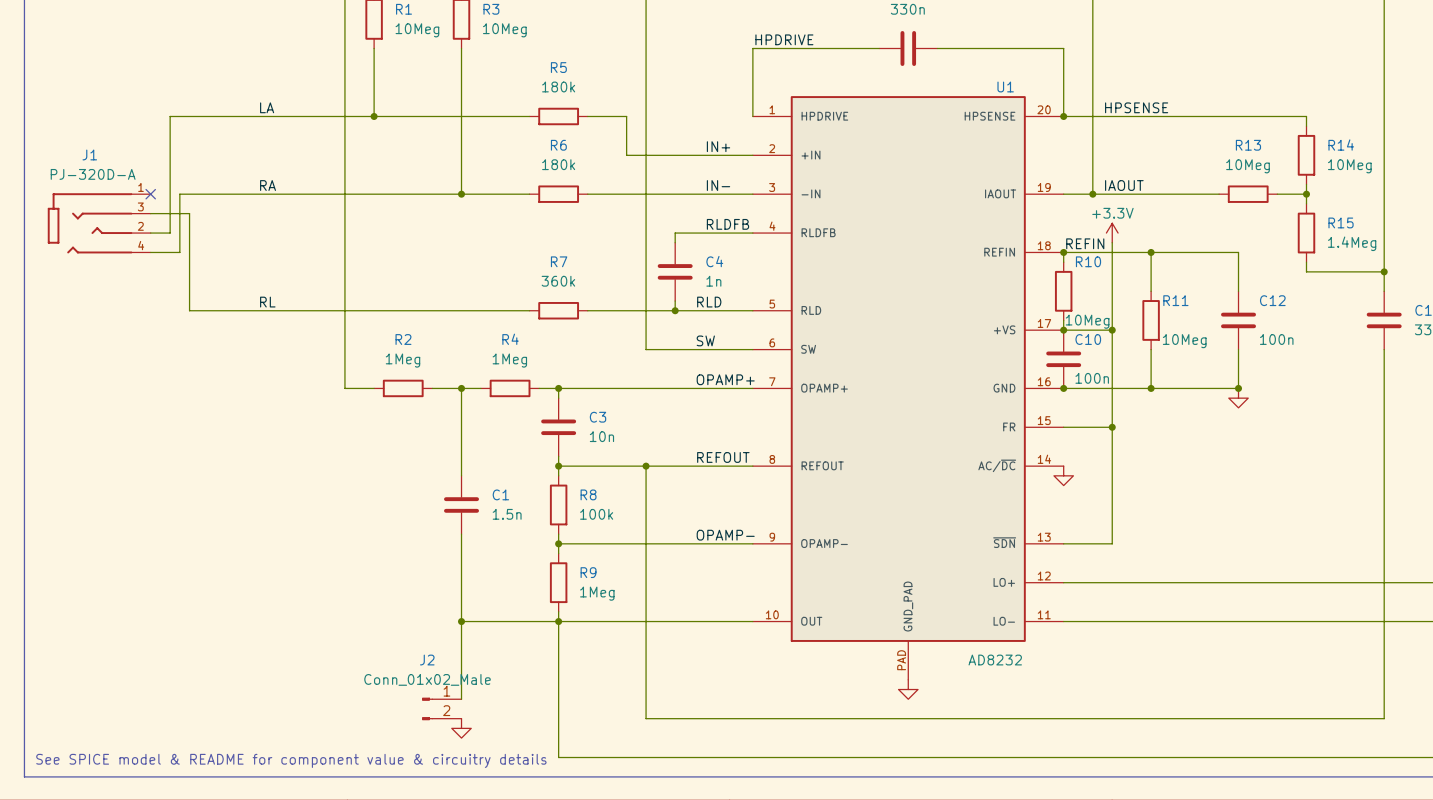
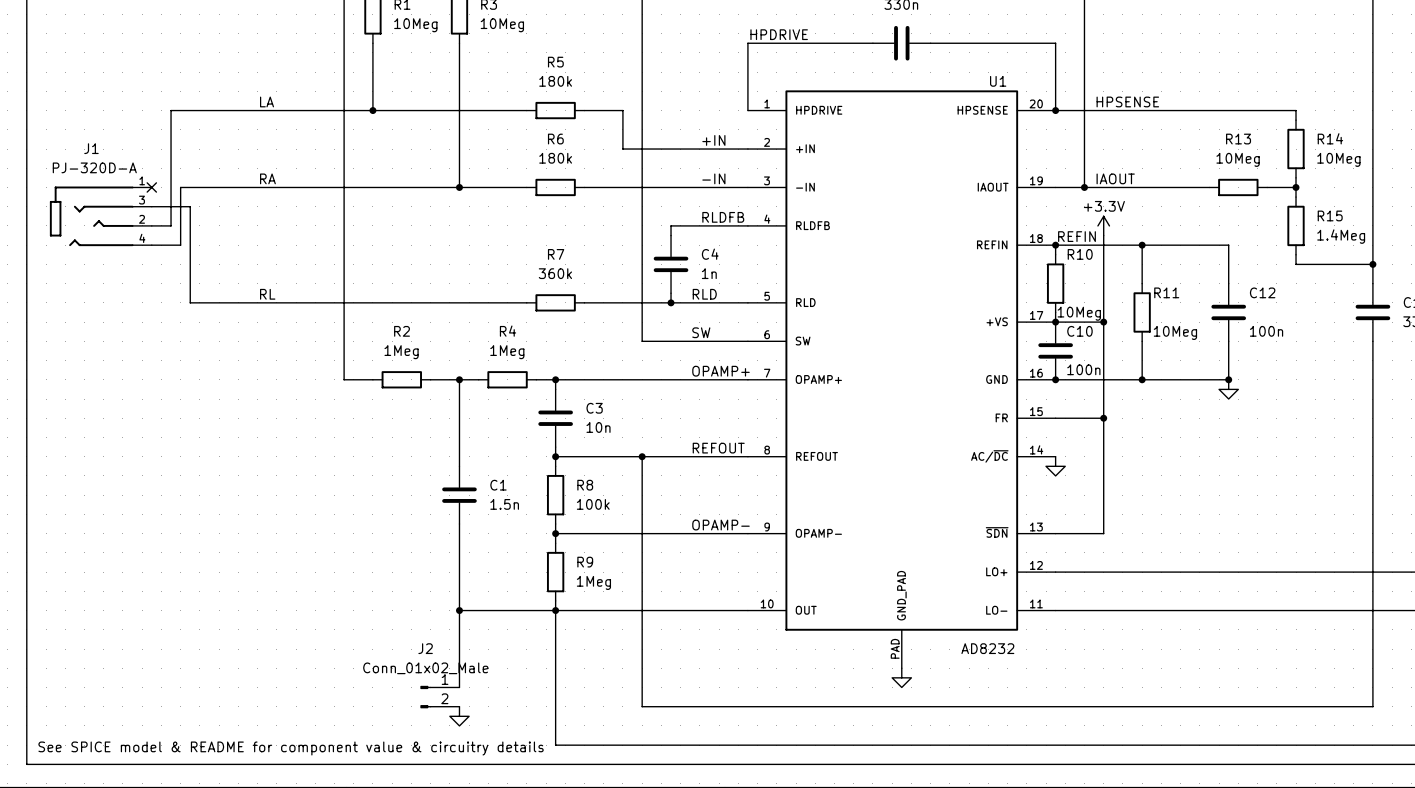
label: IN+ (718, 146) -> +IN (713, 140)
label: IN- (718, 185) -> -IN (713, 178)

